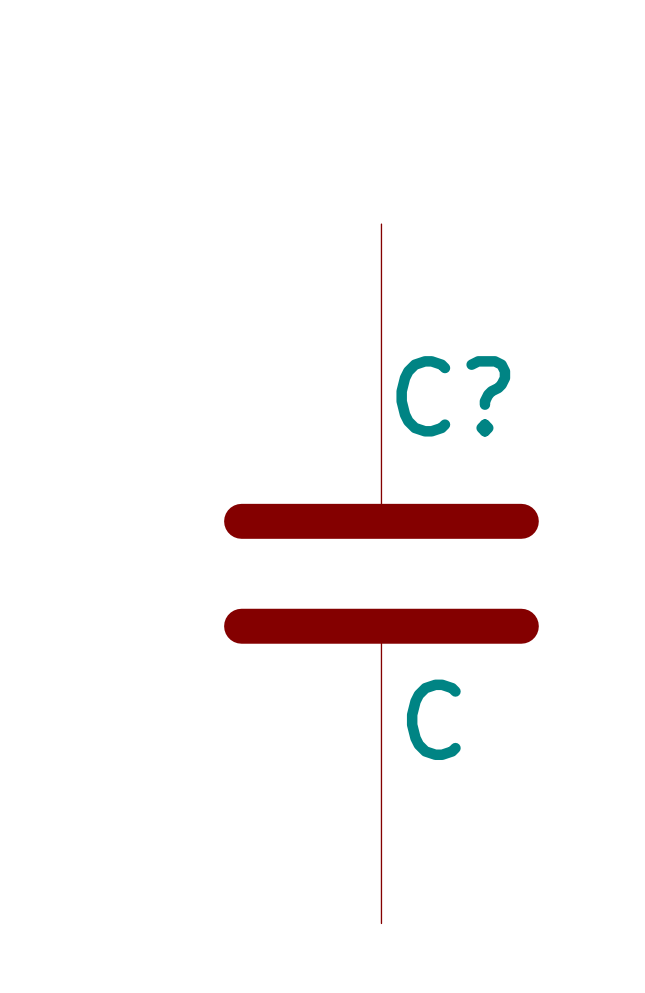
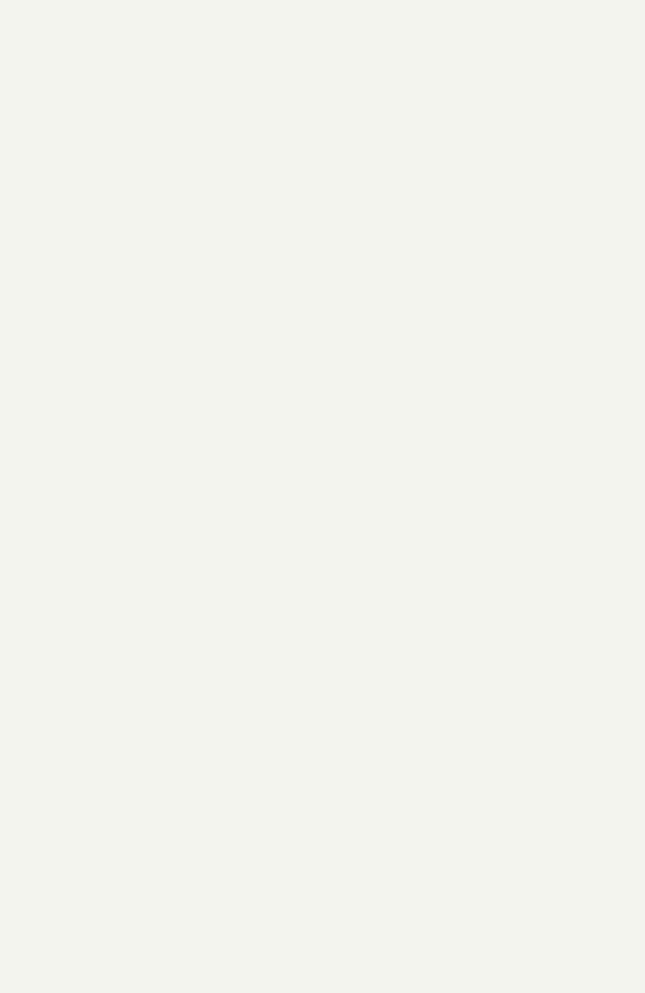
C?: C (381, 573) -> none

